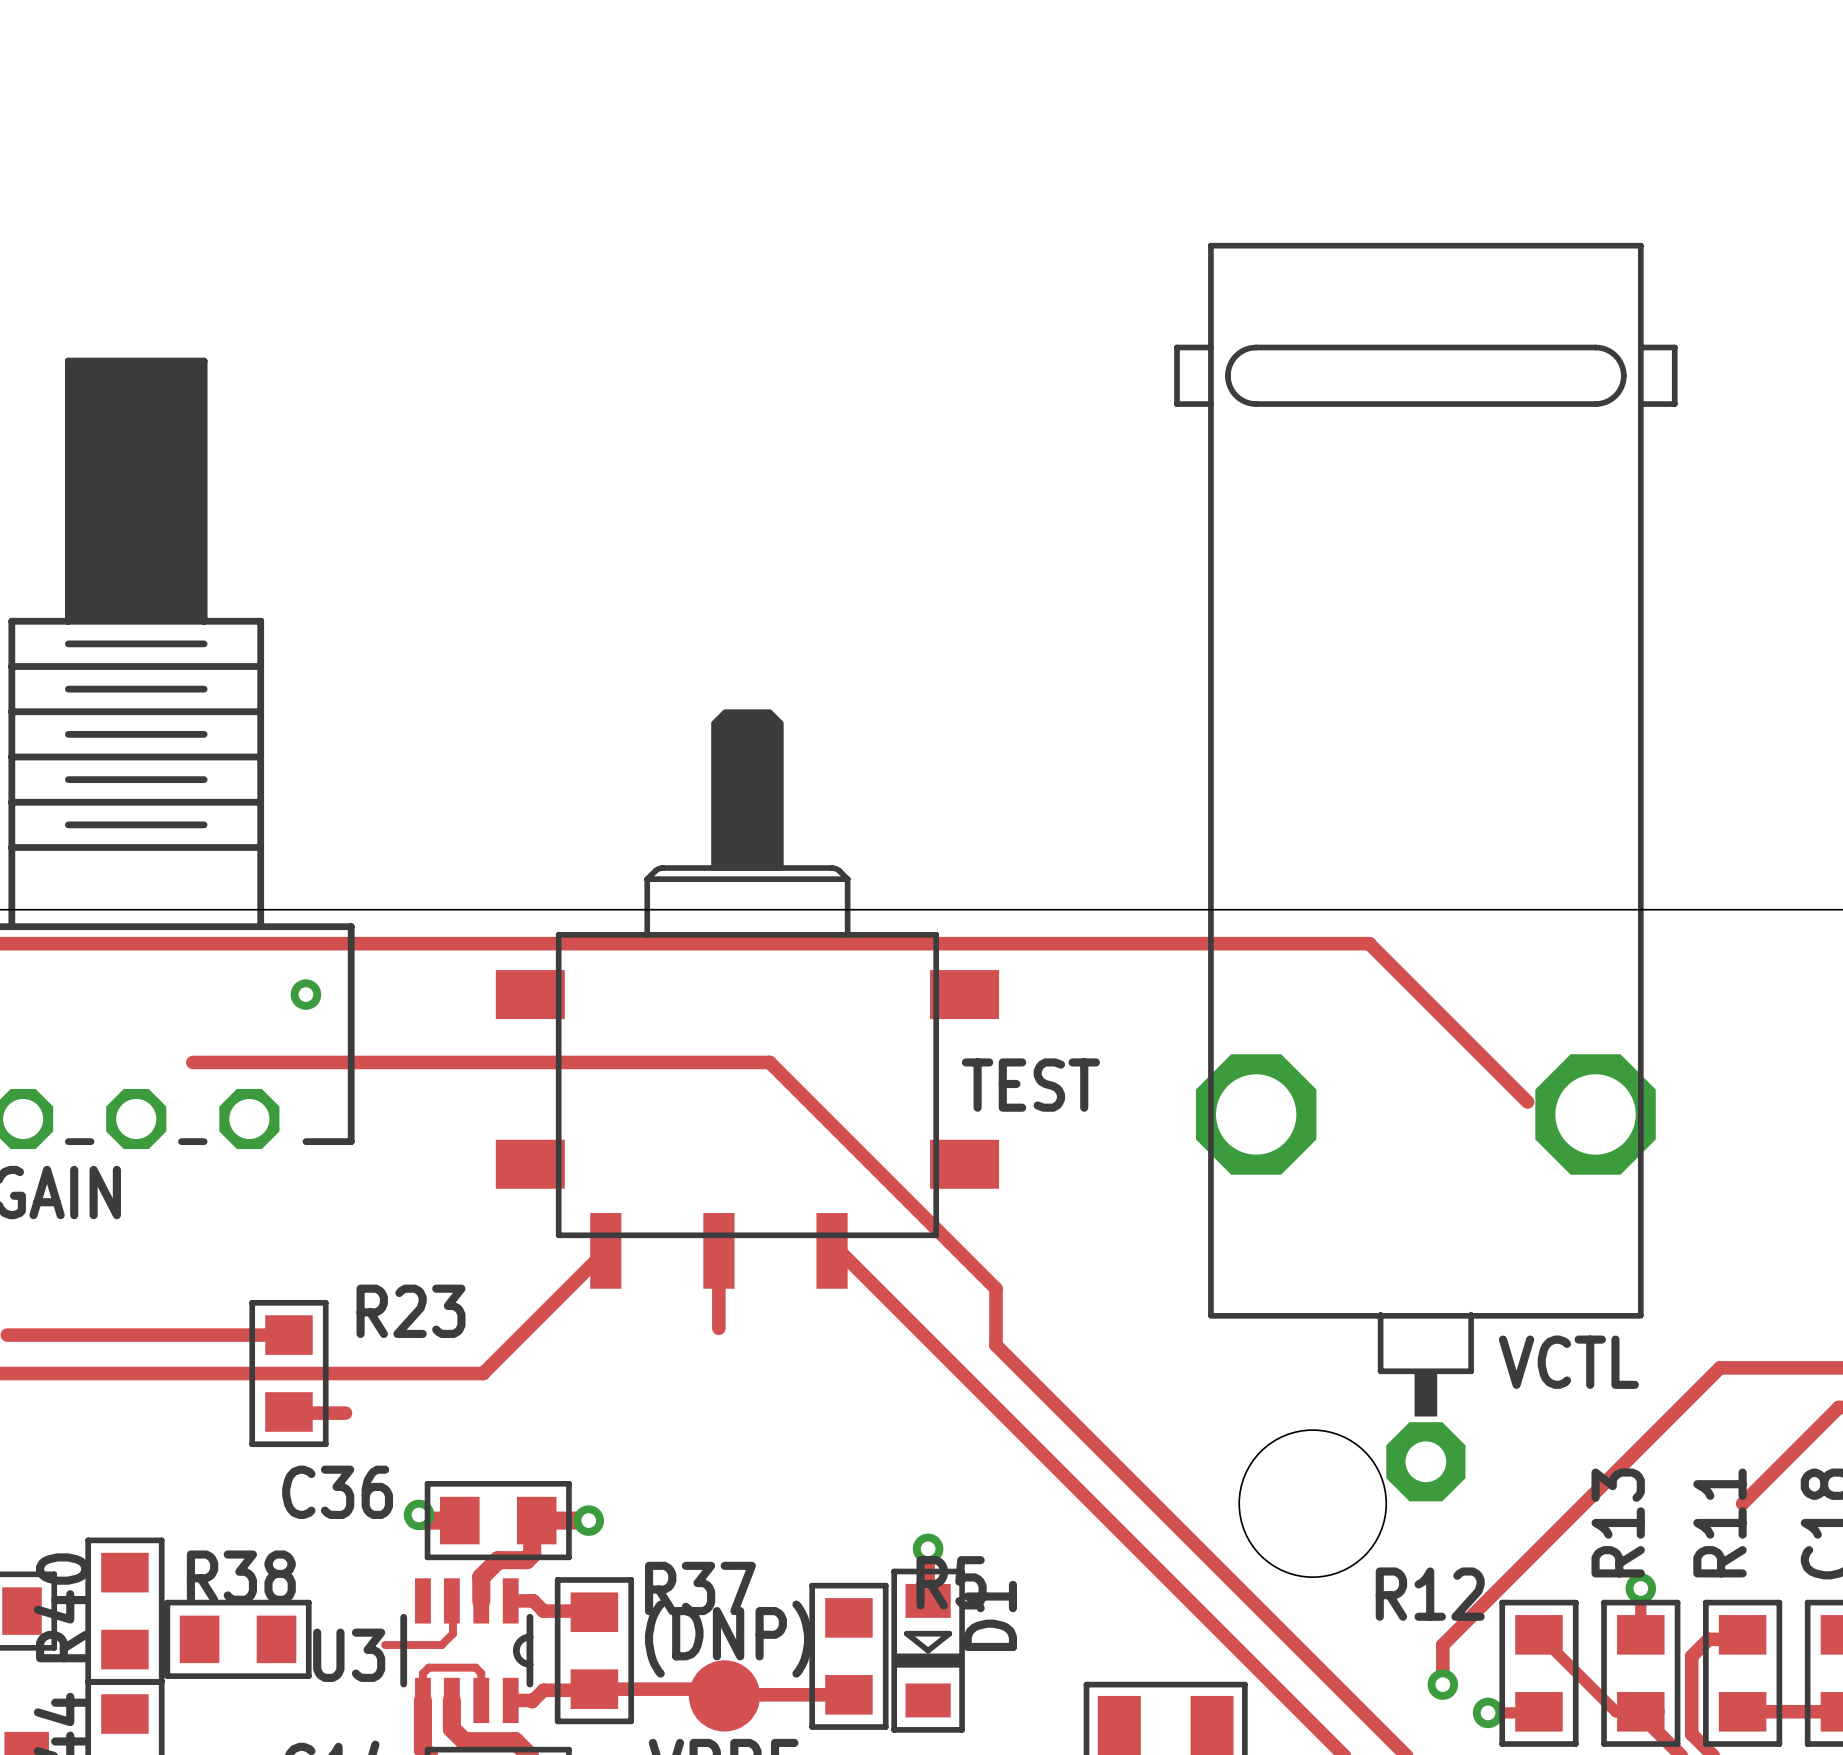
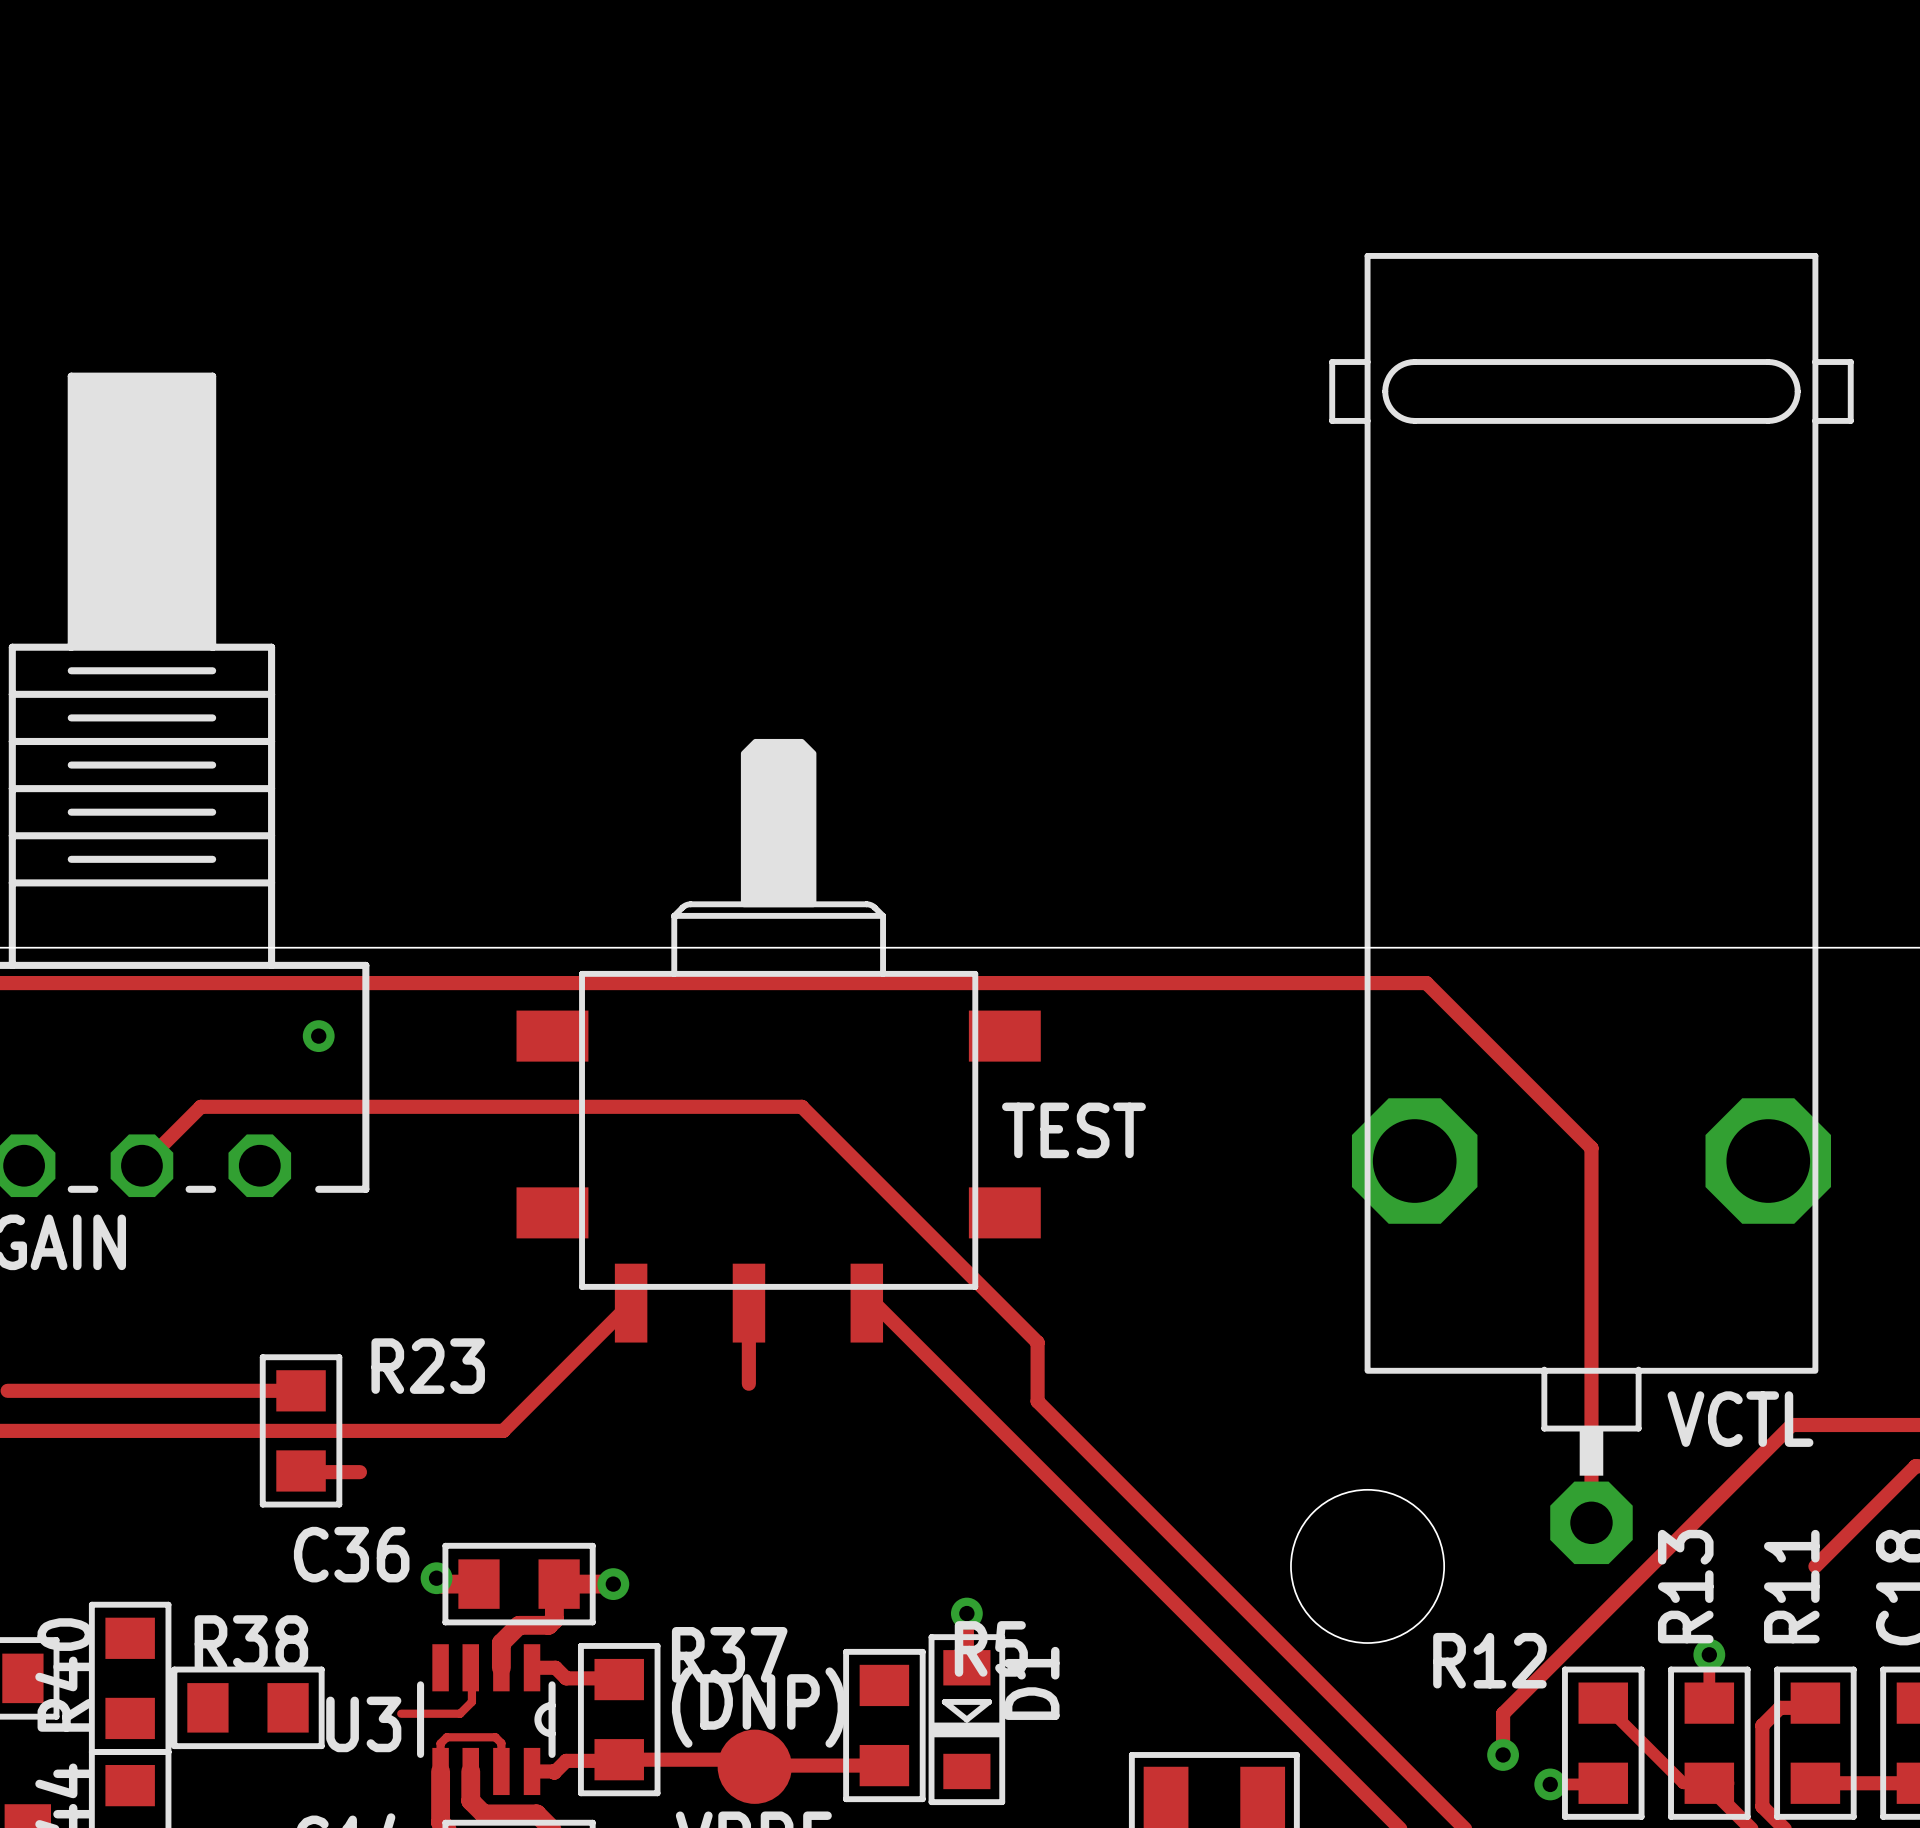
VCTL position: (1425, 872) -> (1591, 908)
track: none -> (200, 1106) (141, 1165)
track: none -> (1591, 1148) (1591, 1522)

